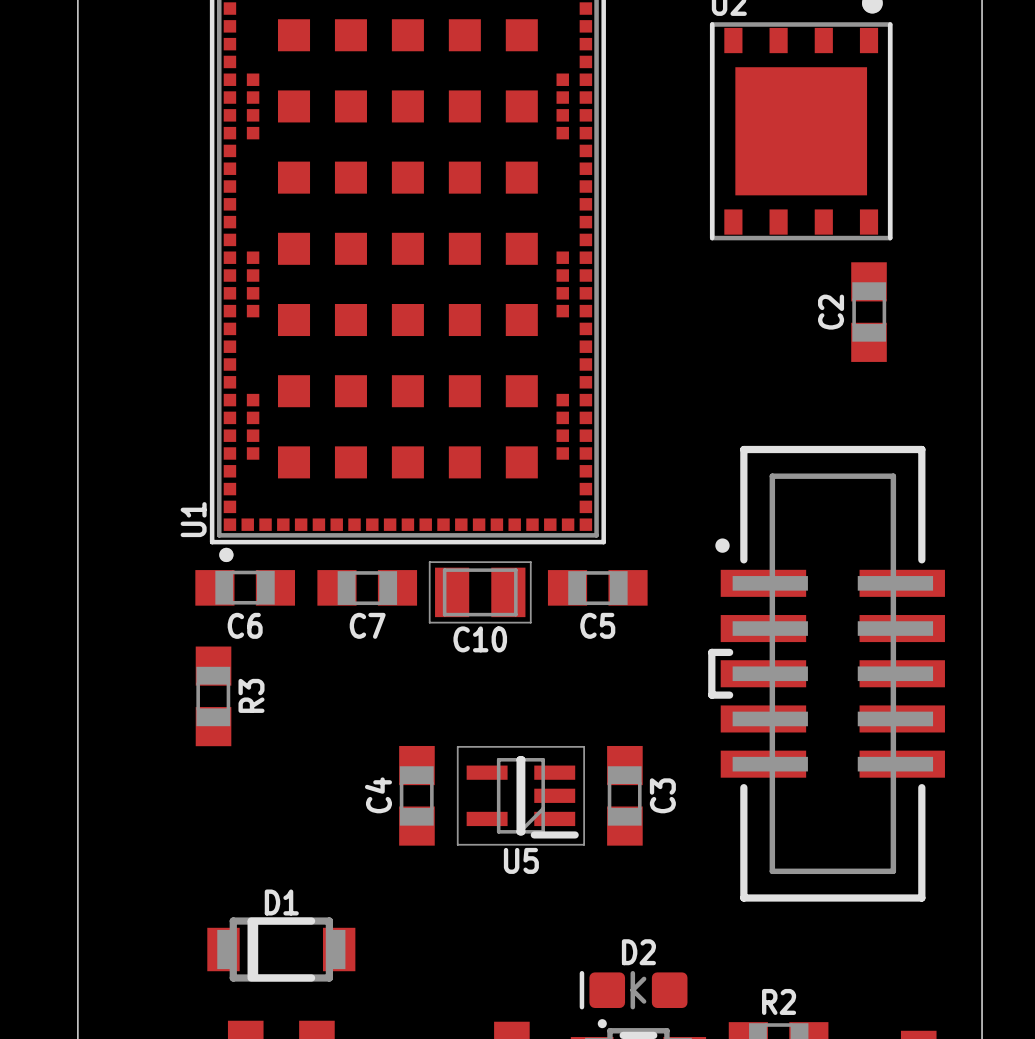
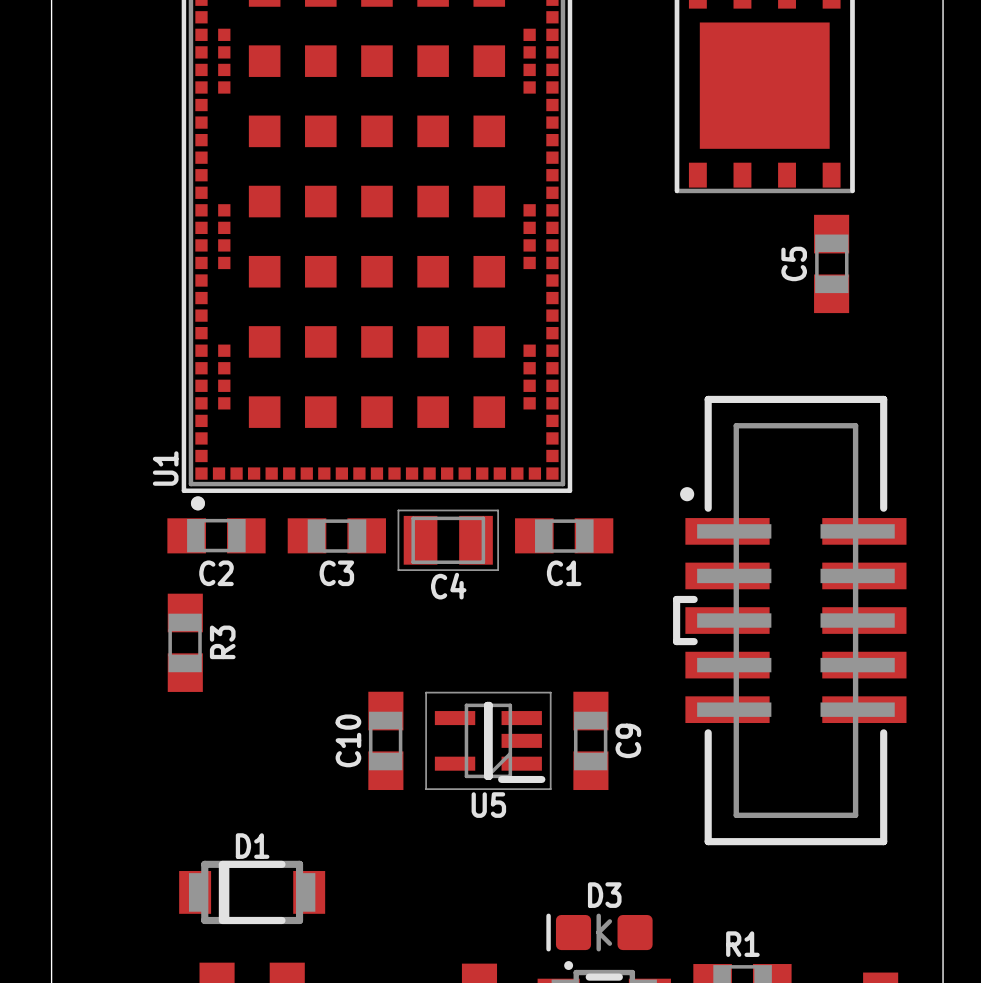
C2 name: C2 (831, 312) -> C5 (794, 263)
C6 name: C6 (245, 625) -> C2 (216, 573)
C7 name: C7 (367, 625) -> C3 (336, 573)
C5 name: C5 (597, 625) -> C1 (564, 573)
C10 name: C10 (480, 639) -> C4 (448, 586)
C4 name: C4 (378, 795) -> C10 (348, 740)
C3 name: C3 (662, 795) -> C9 (628, 740)
D2 name: D2 (638, 952) -> D3 (604, 895)
R2 name: R2 (779, 1001) -> R1 (742, 944)

